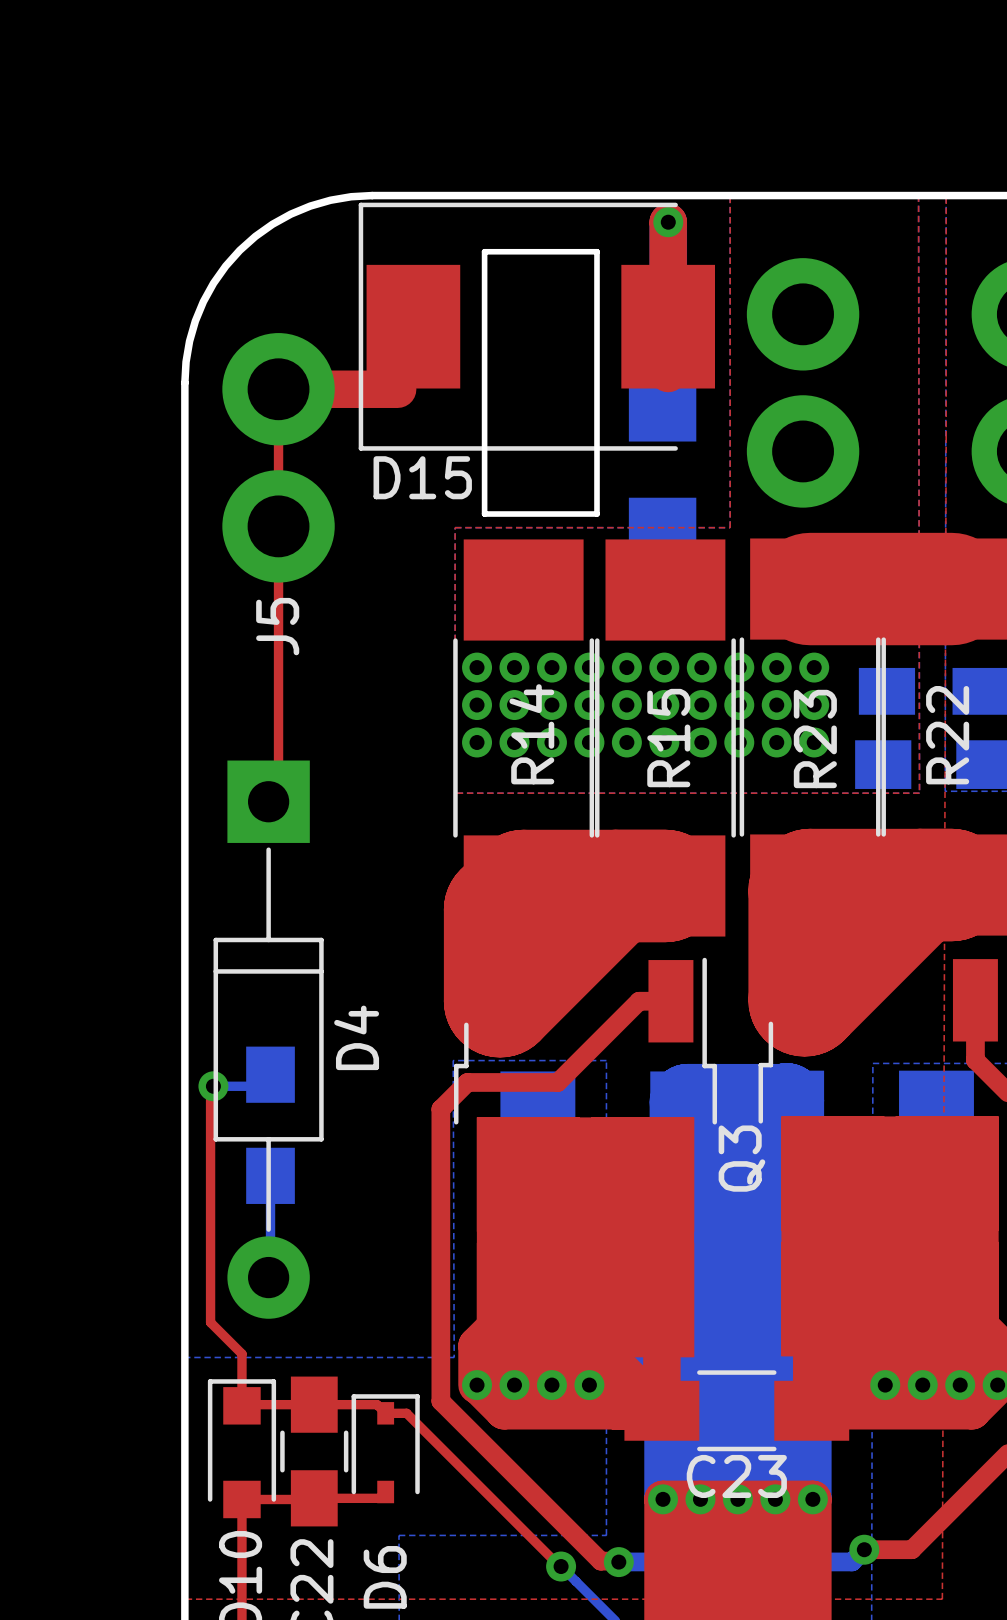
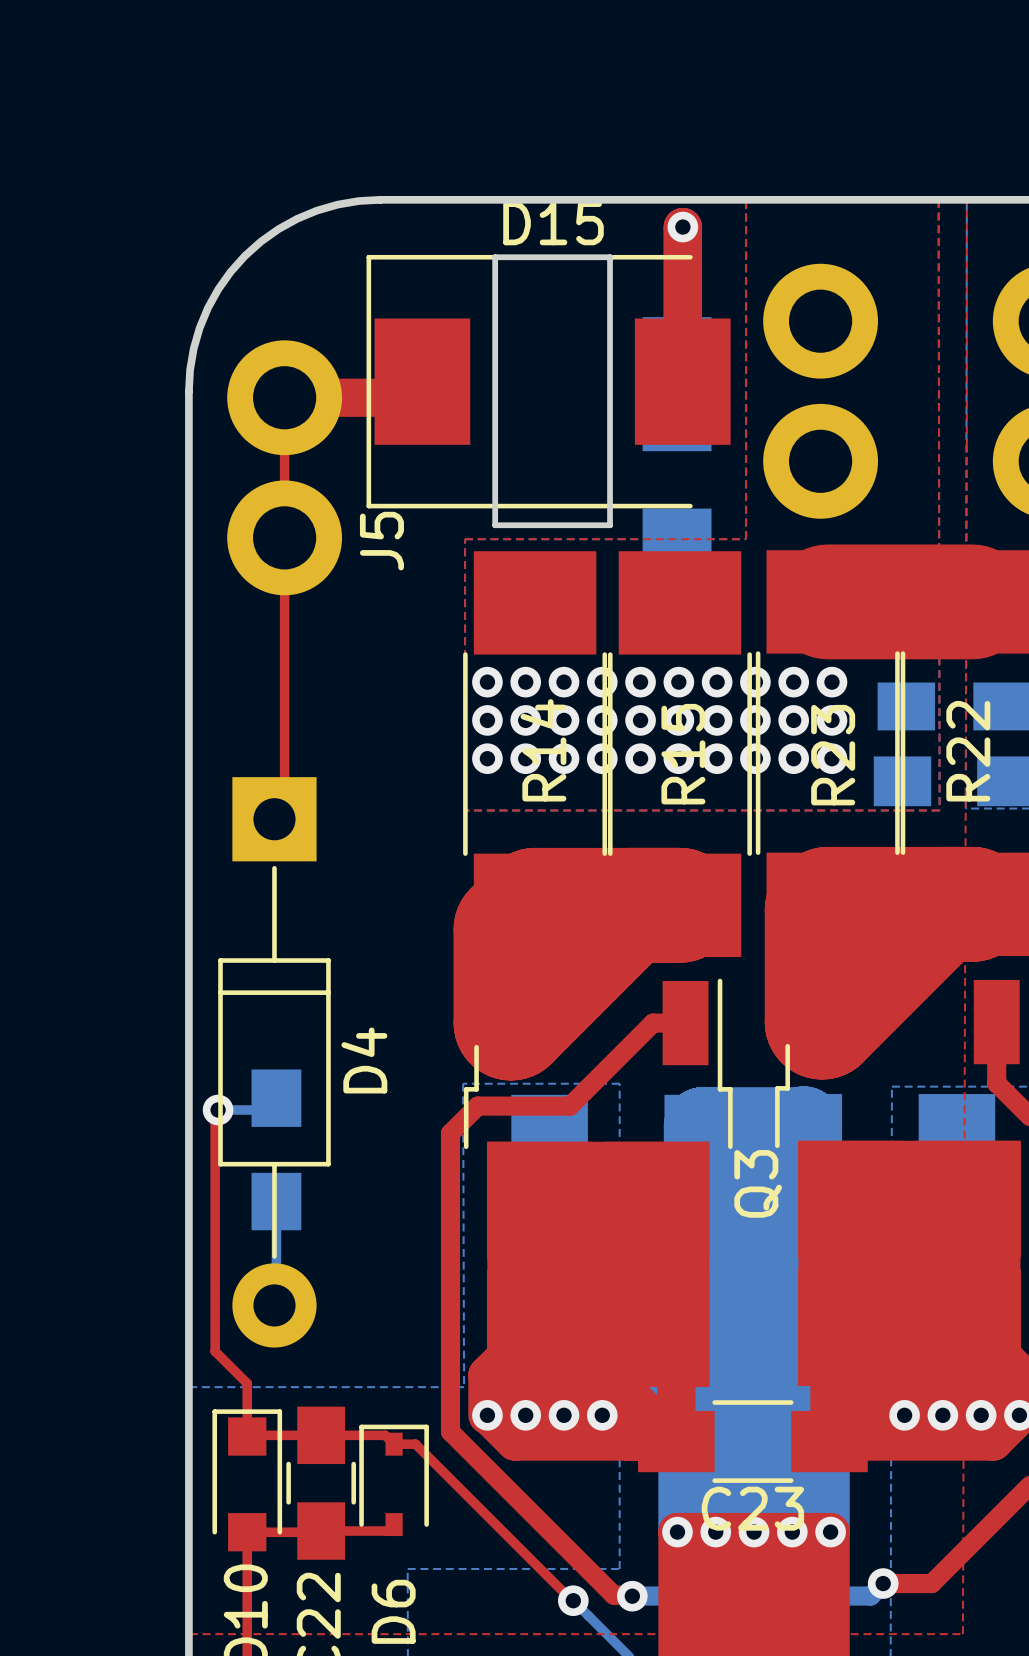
D15 position: (536, 326) -> (548, 381)
D15 name position: D15 (422, 477) -> D15 (553, 223)
J5 name position: J5 (277, 626) -> J5 (381, 541)

